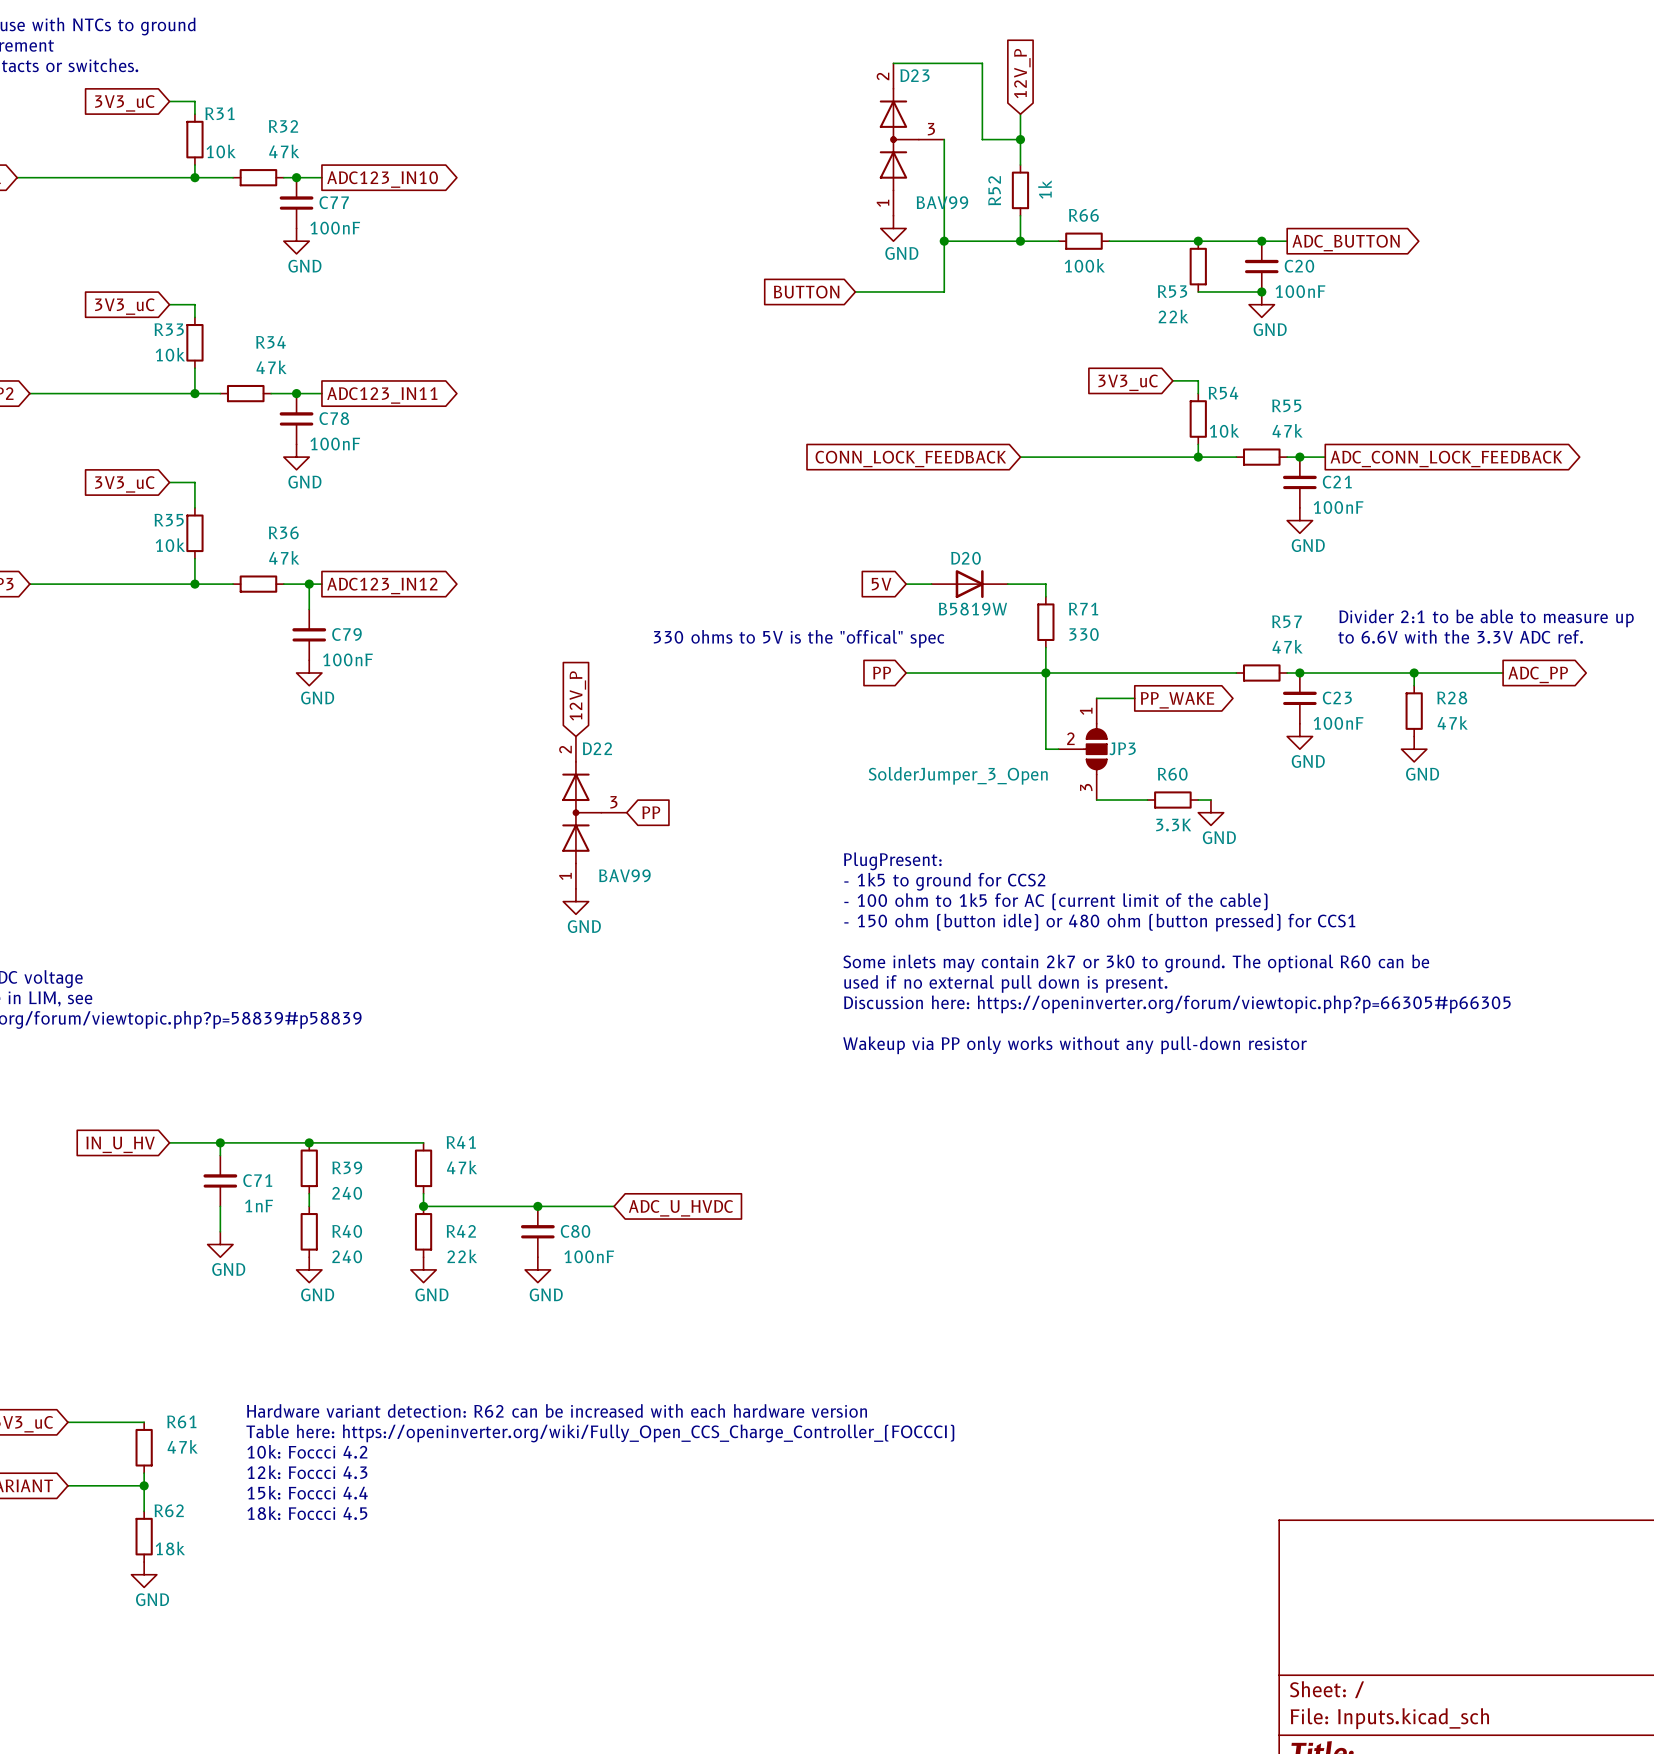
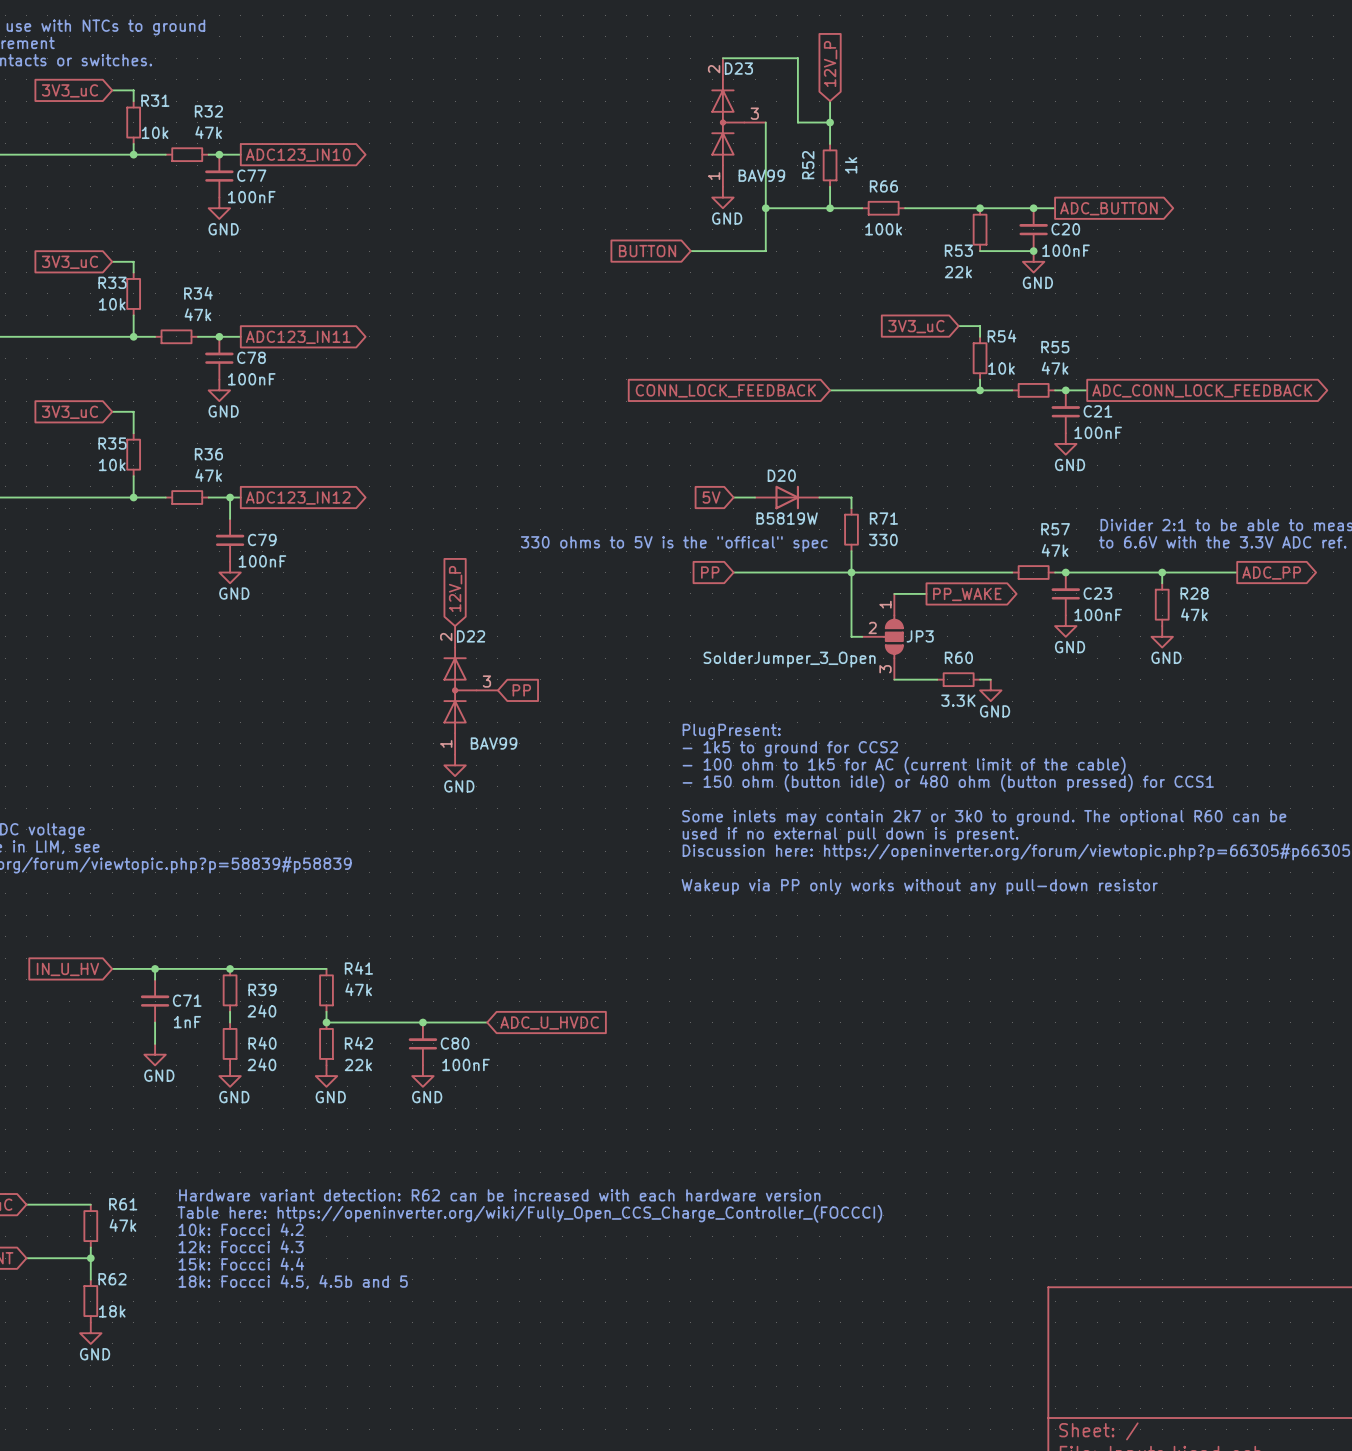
text: 18k: Foccci 4.5 (307, 1513) -> 18k: Foccci 4.5, 4.5b and 5 (293, 1282)

